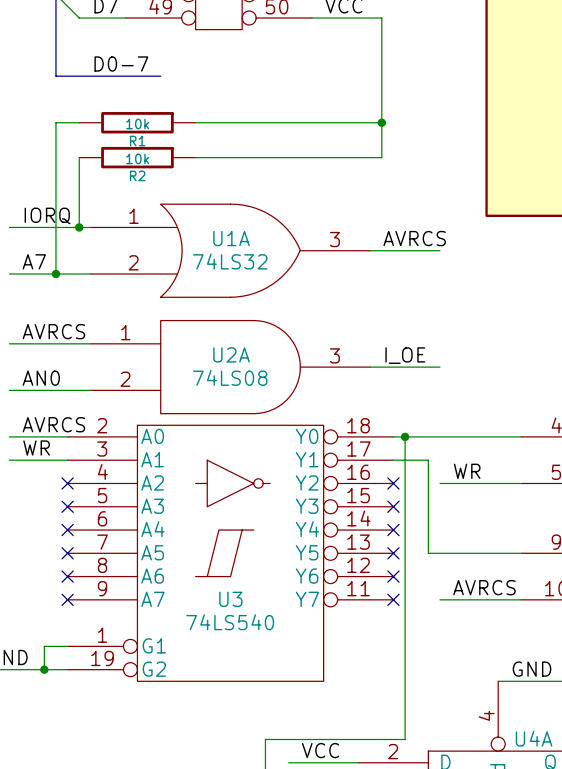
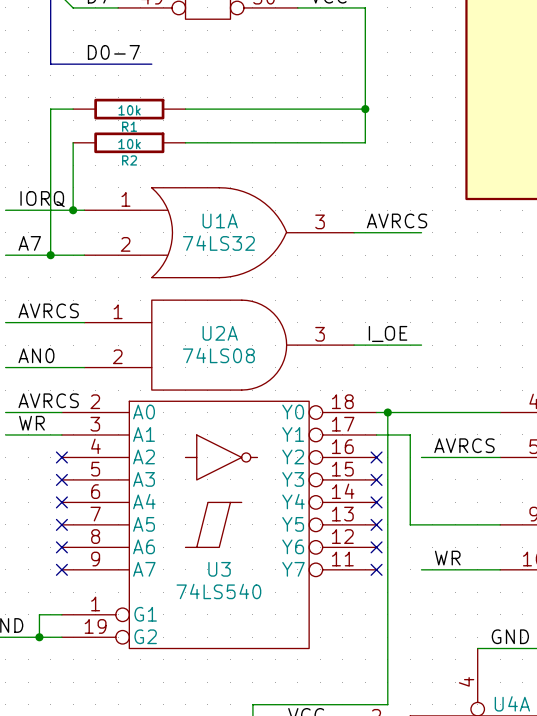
label: WR (467, 471) -> AVRCS (464, 445)
label: AVRCS (484, 587) -> WR (447, 558)

